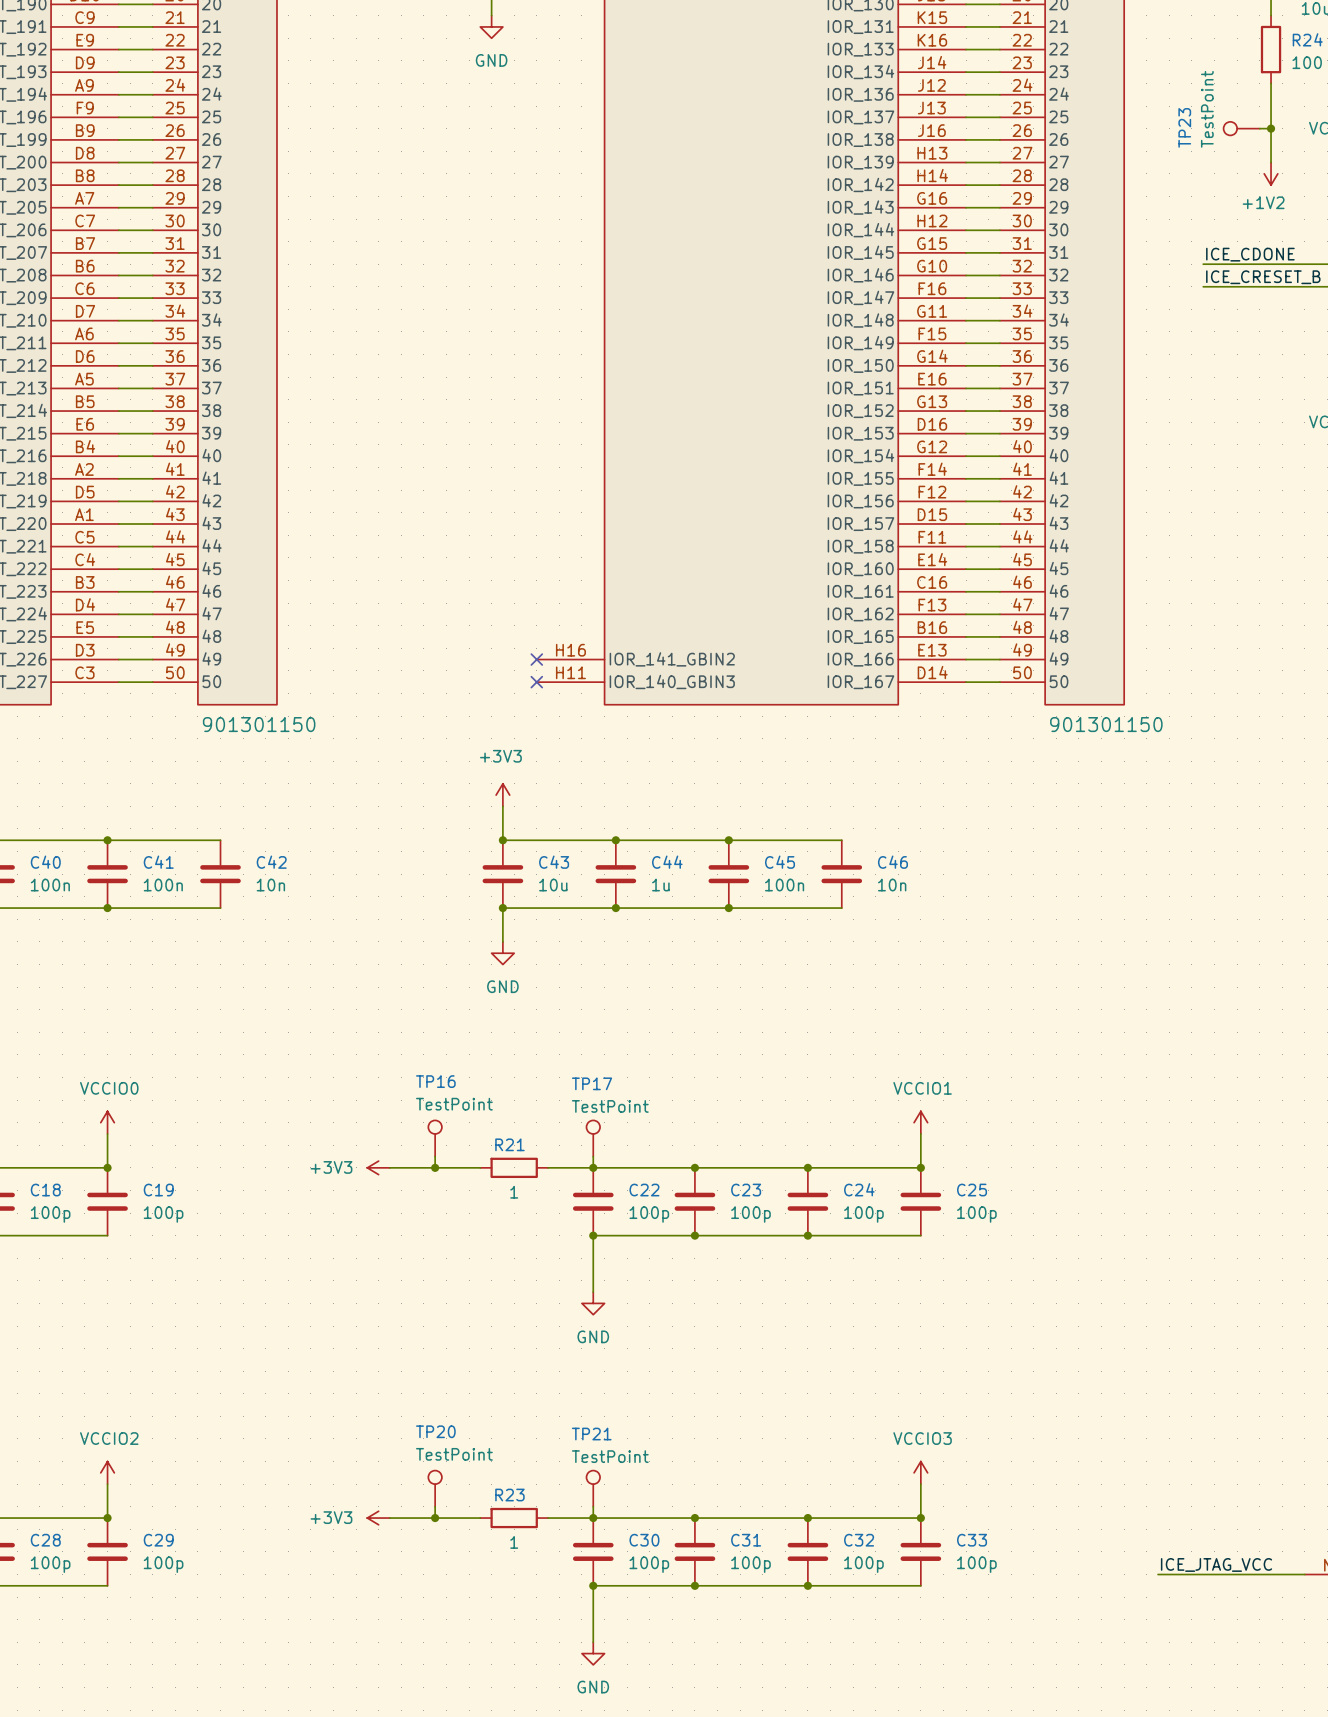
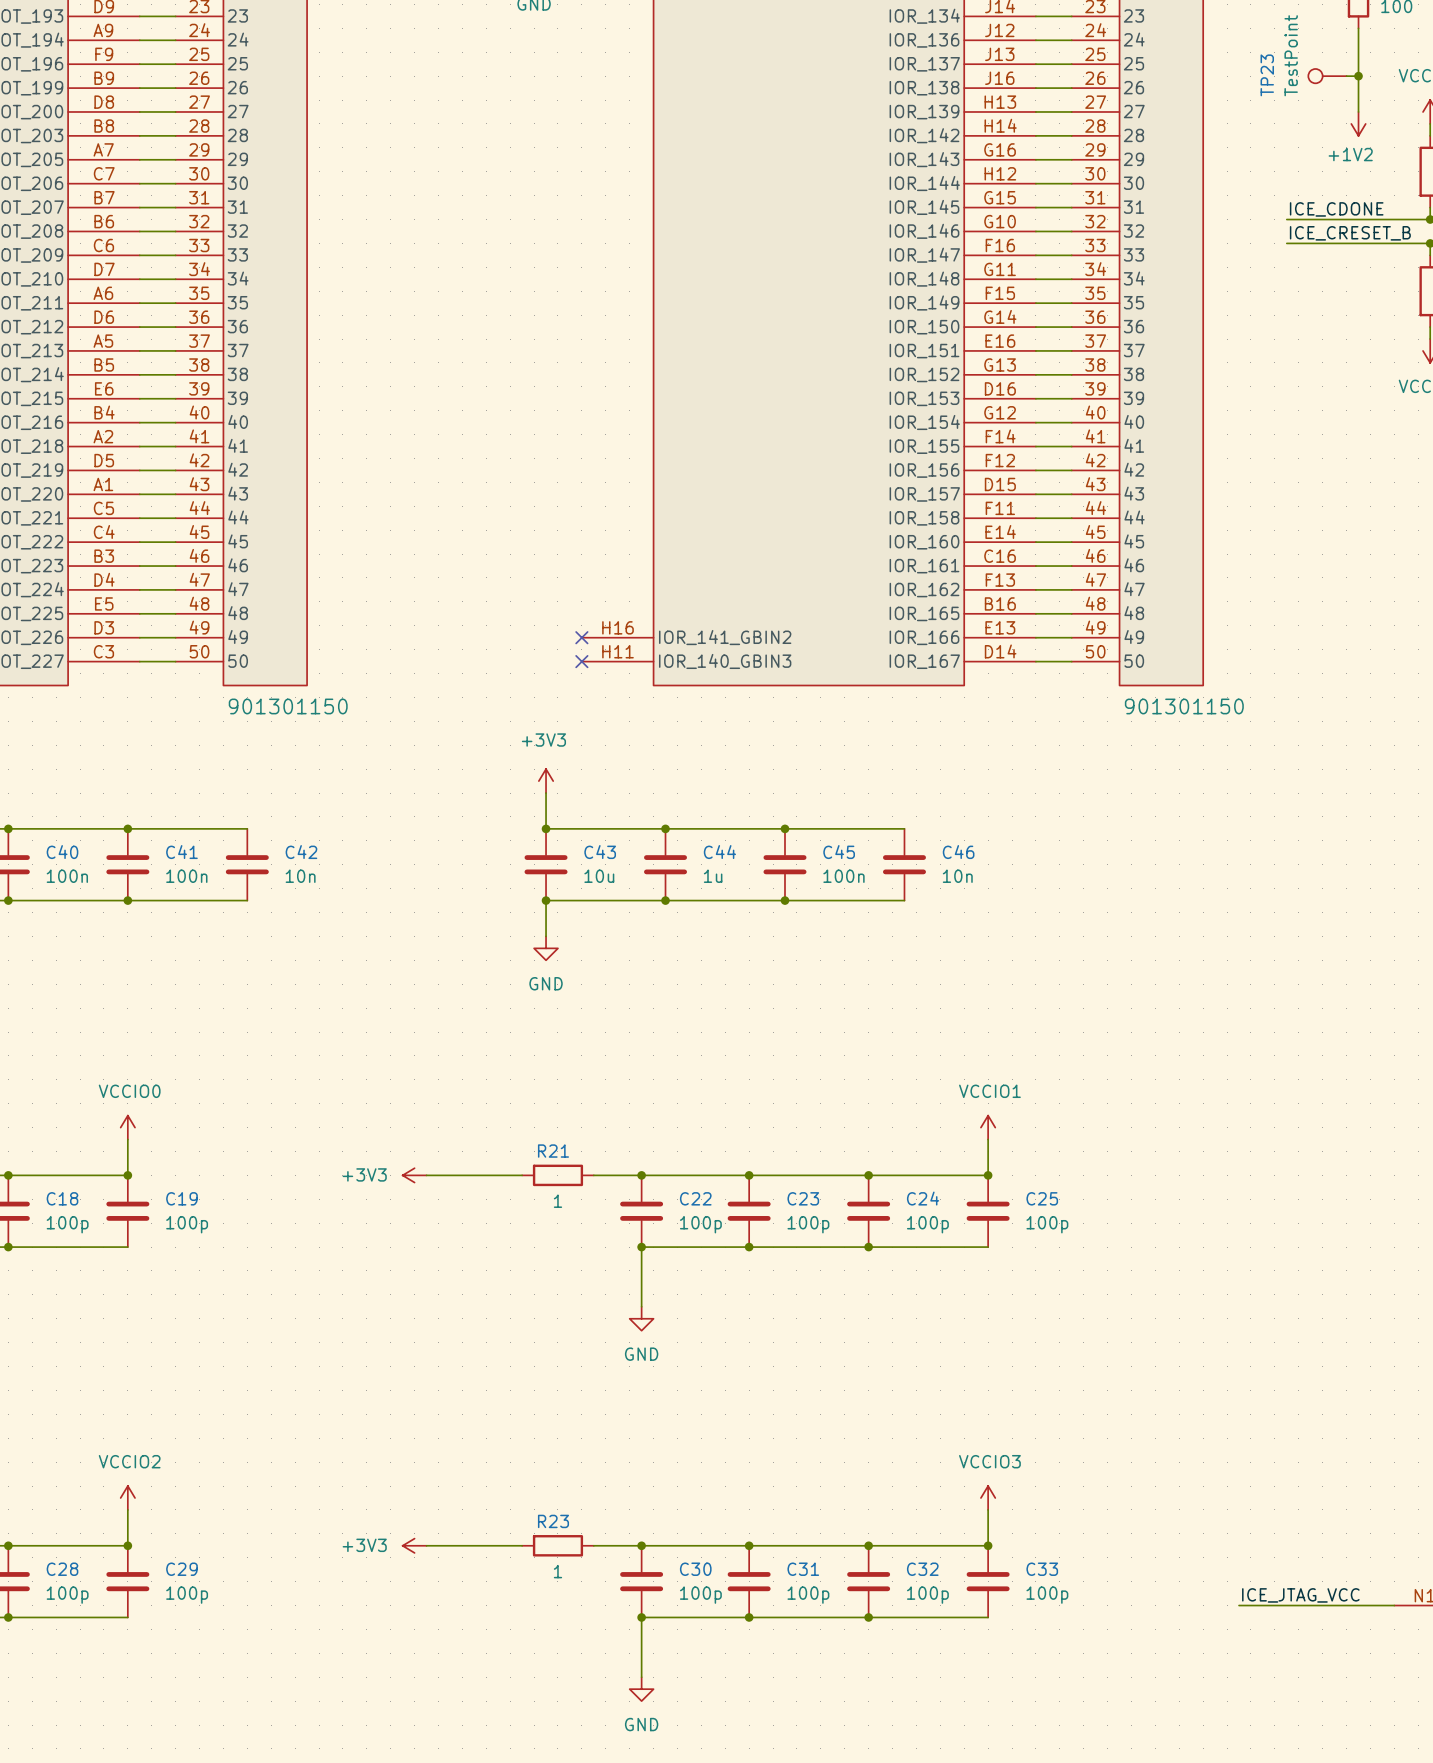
TP16: TestPoint (435, 1138) -> none
TP17: TestPoint (593, 1138) -> none
wire: (435, 1156) (435, 1167) -> none
wire: (593, 1156) (593, 1167) -> none
junction: (435, 1167) -> none
TP20: TestPoint (435, 1488) -> none
TP21: TestPoint (593, 1488) -> none
wire: (435, 1506) (435, 1518) -> none
wire: (593, 1506) (593, 1518) -> none
junction: (435, 1518) -> none

